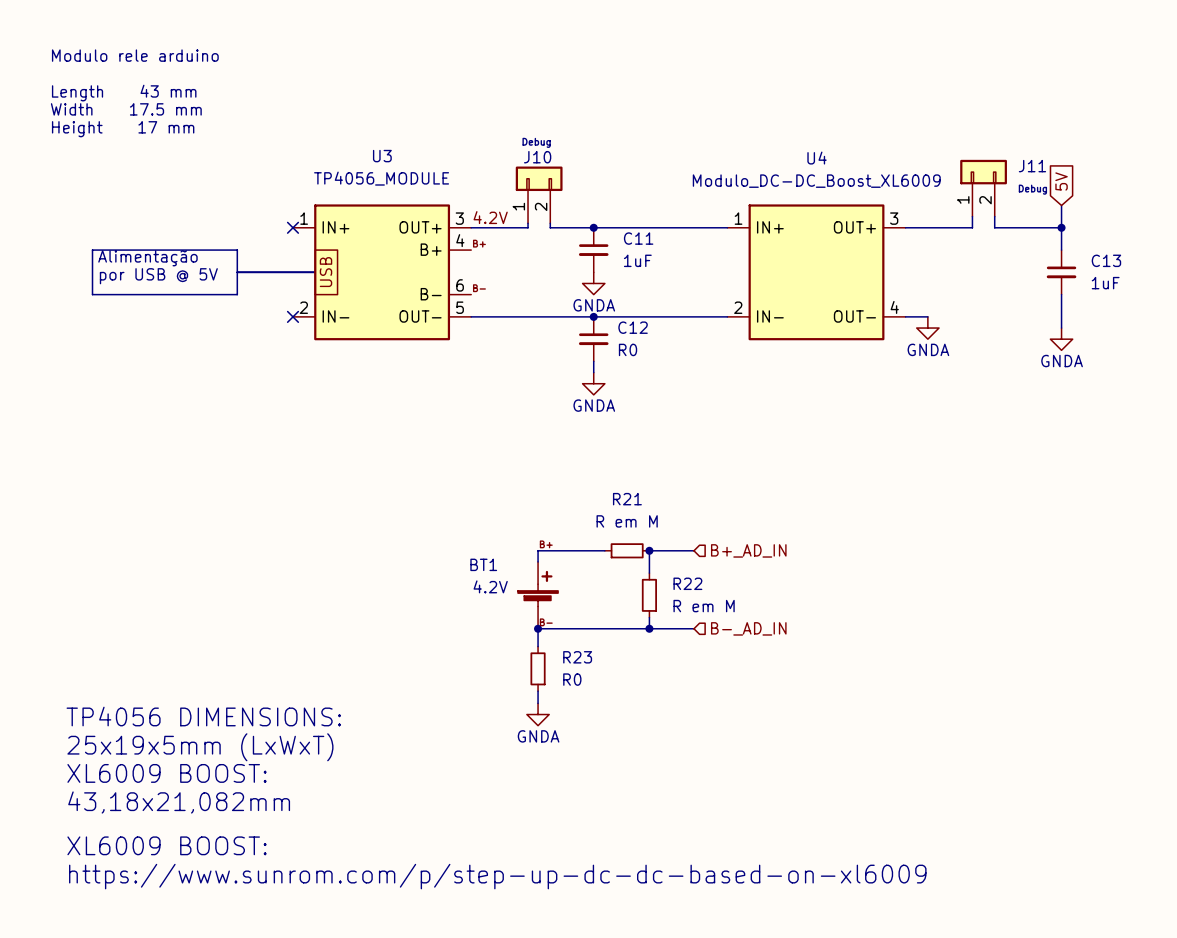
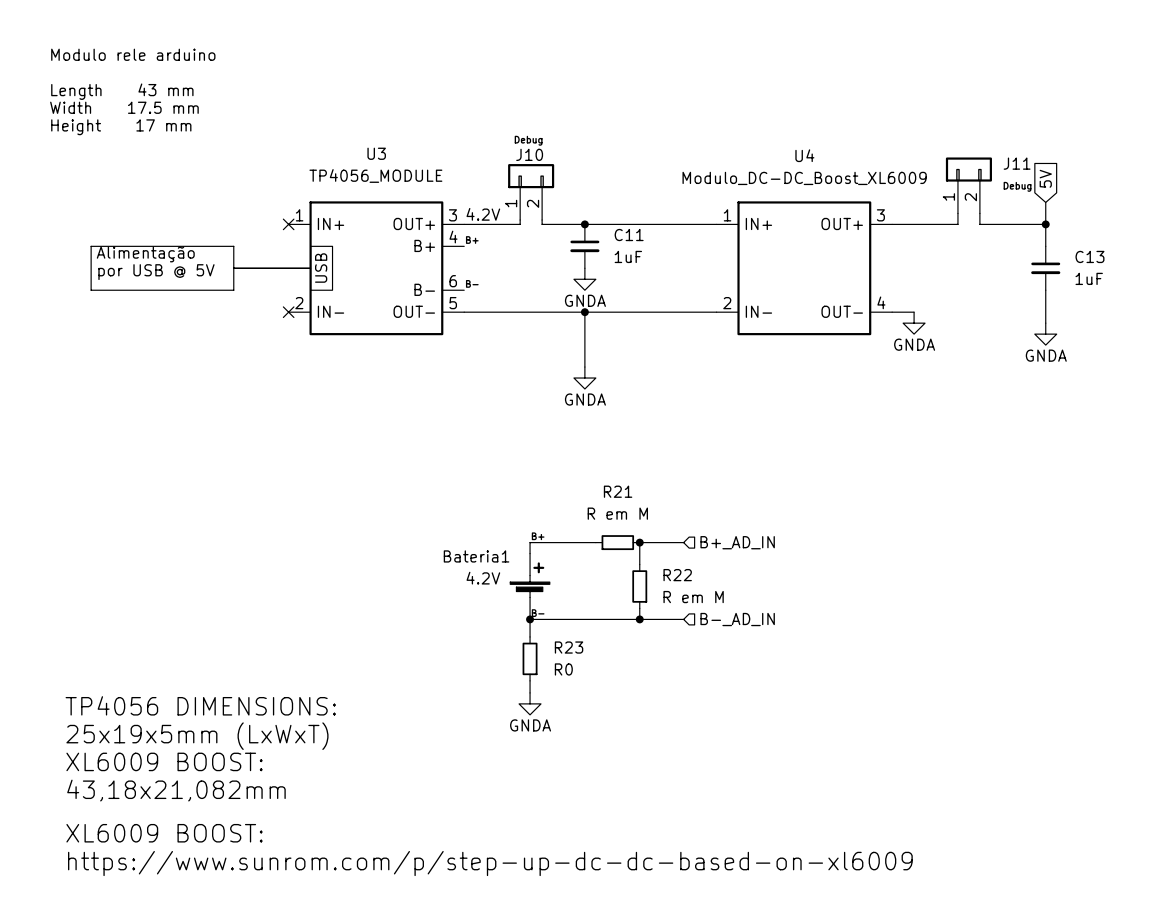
C12: R0 (593, 339) -> none
BT1 name: BT1 (483, 564) -> Bateria1 (476, 556)

